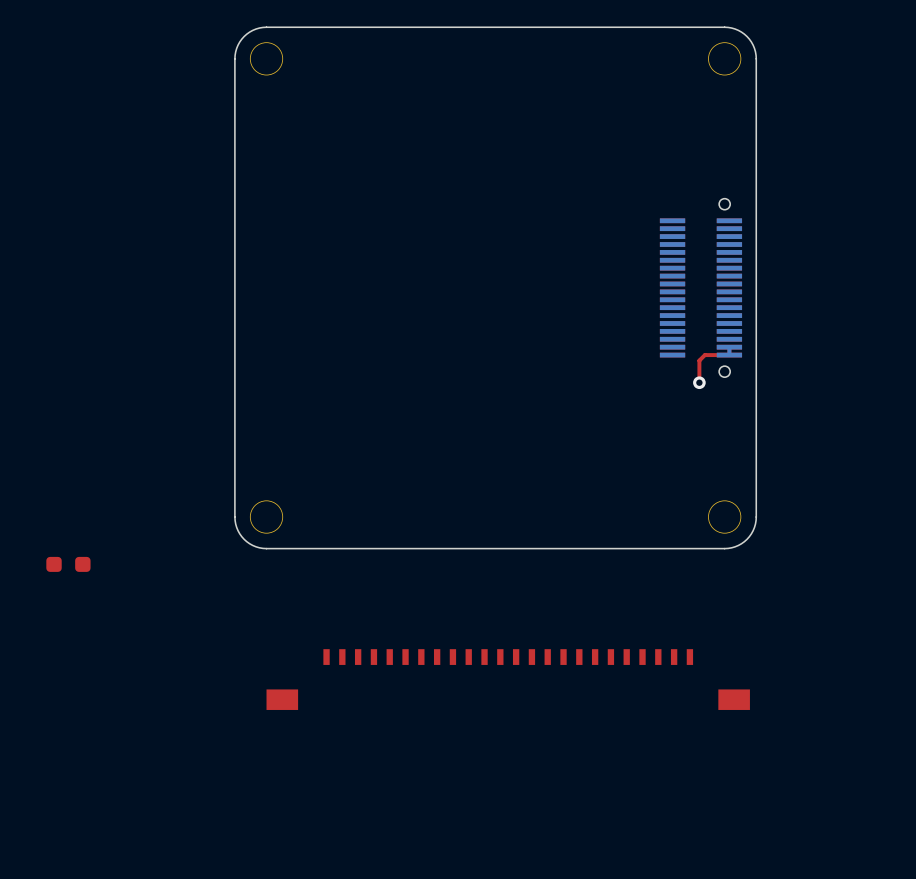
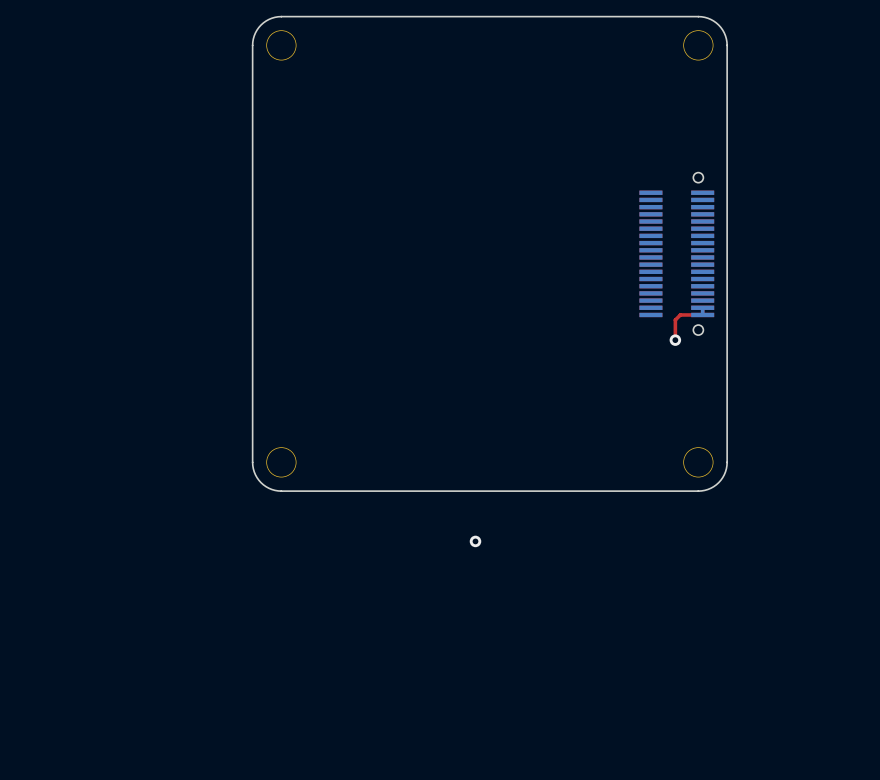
part: (68, 564) -> none
via: none -> (475, 541)
part: (508, 679) -> none

